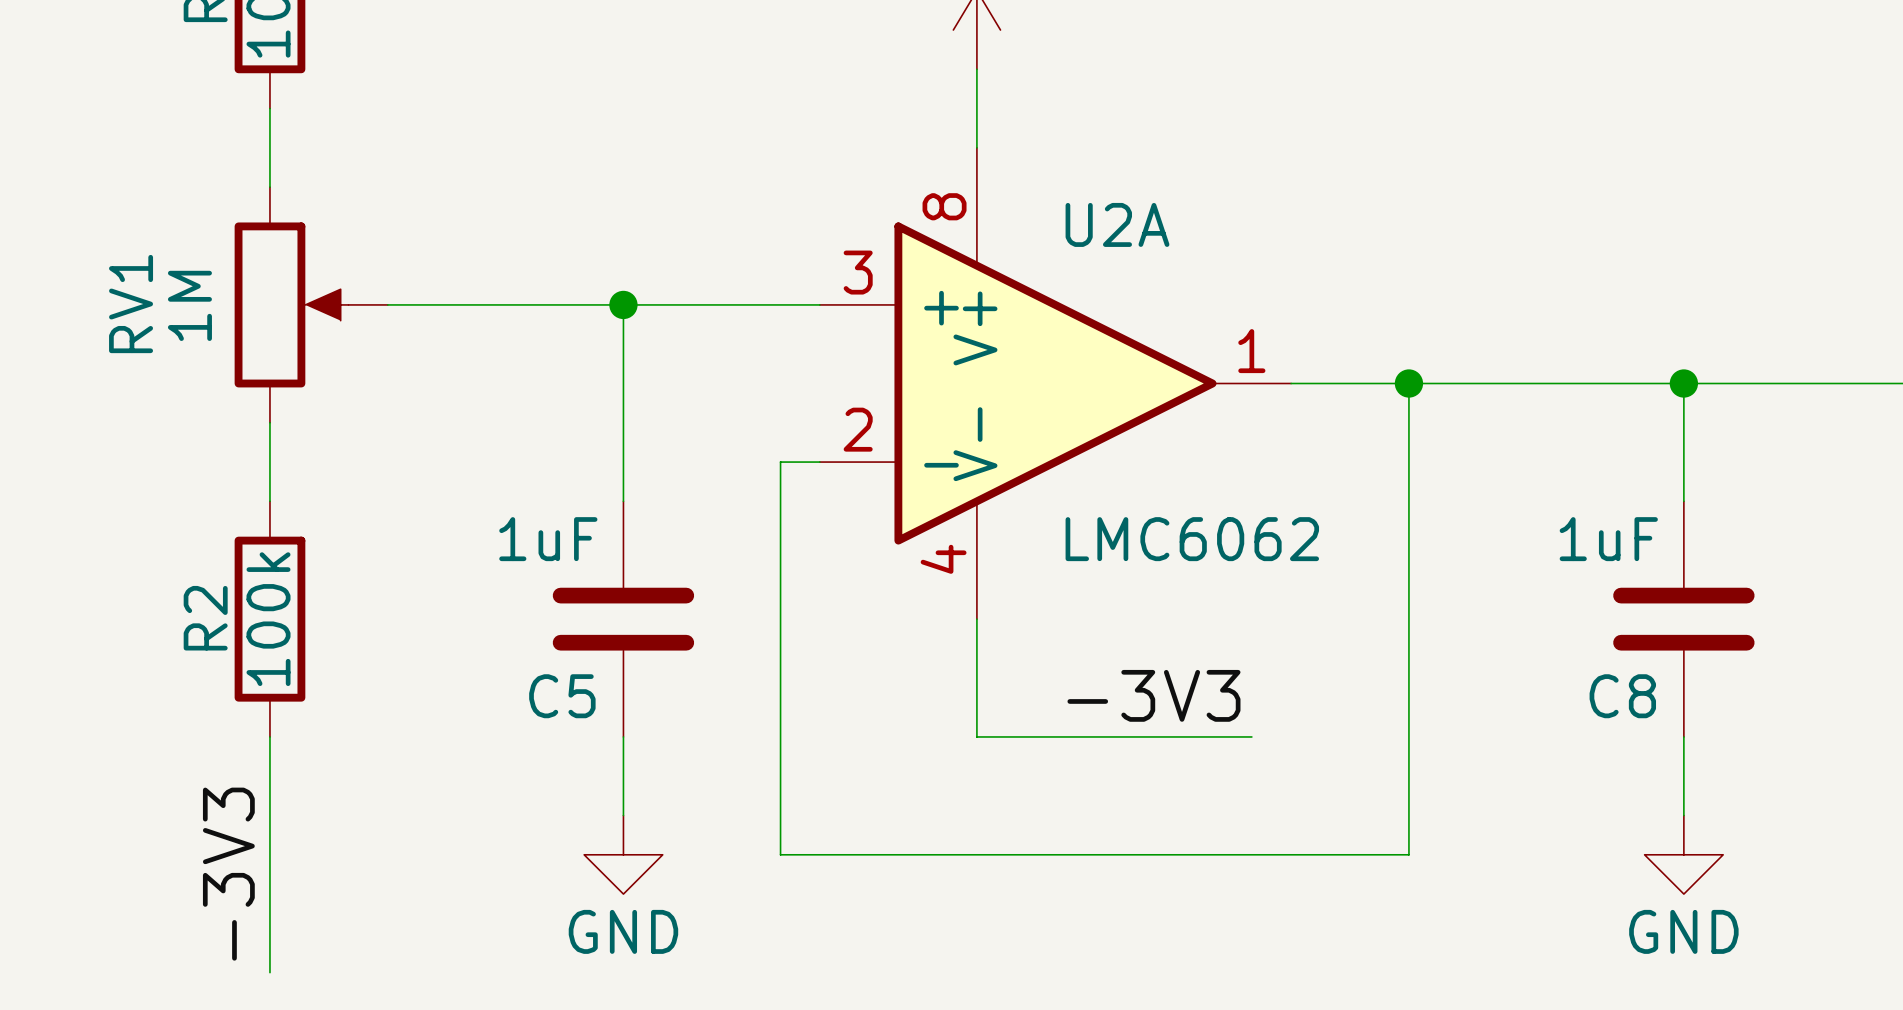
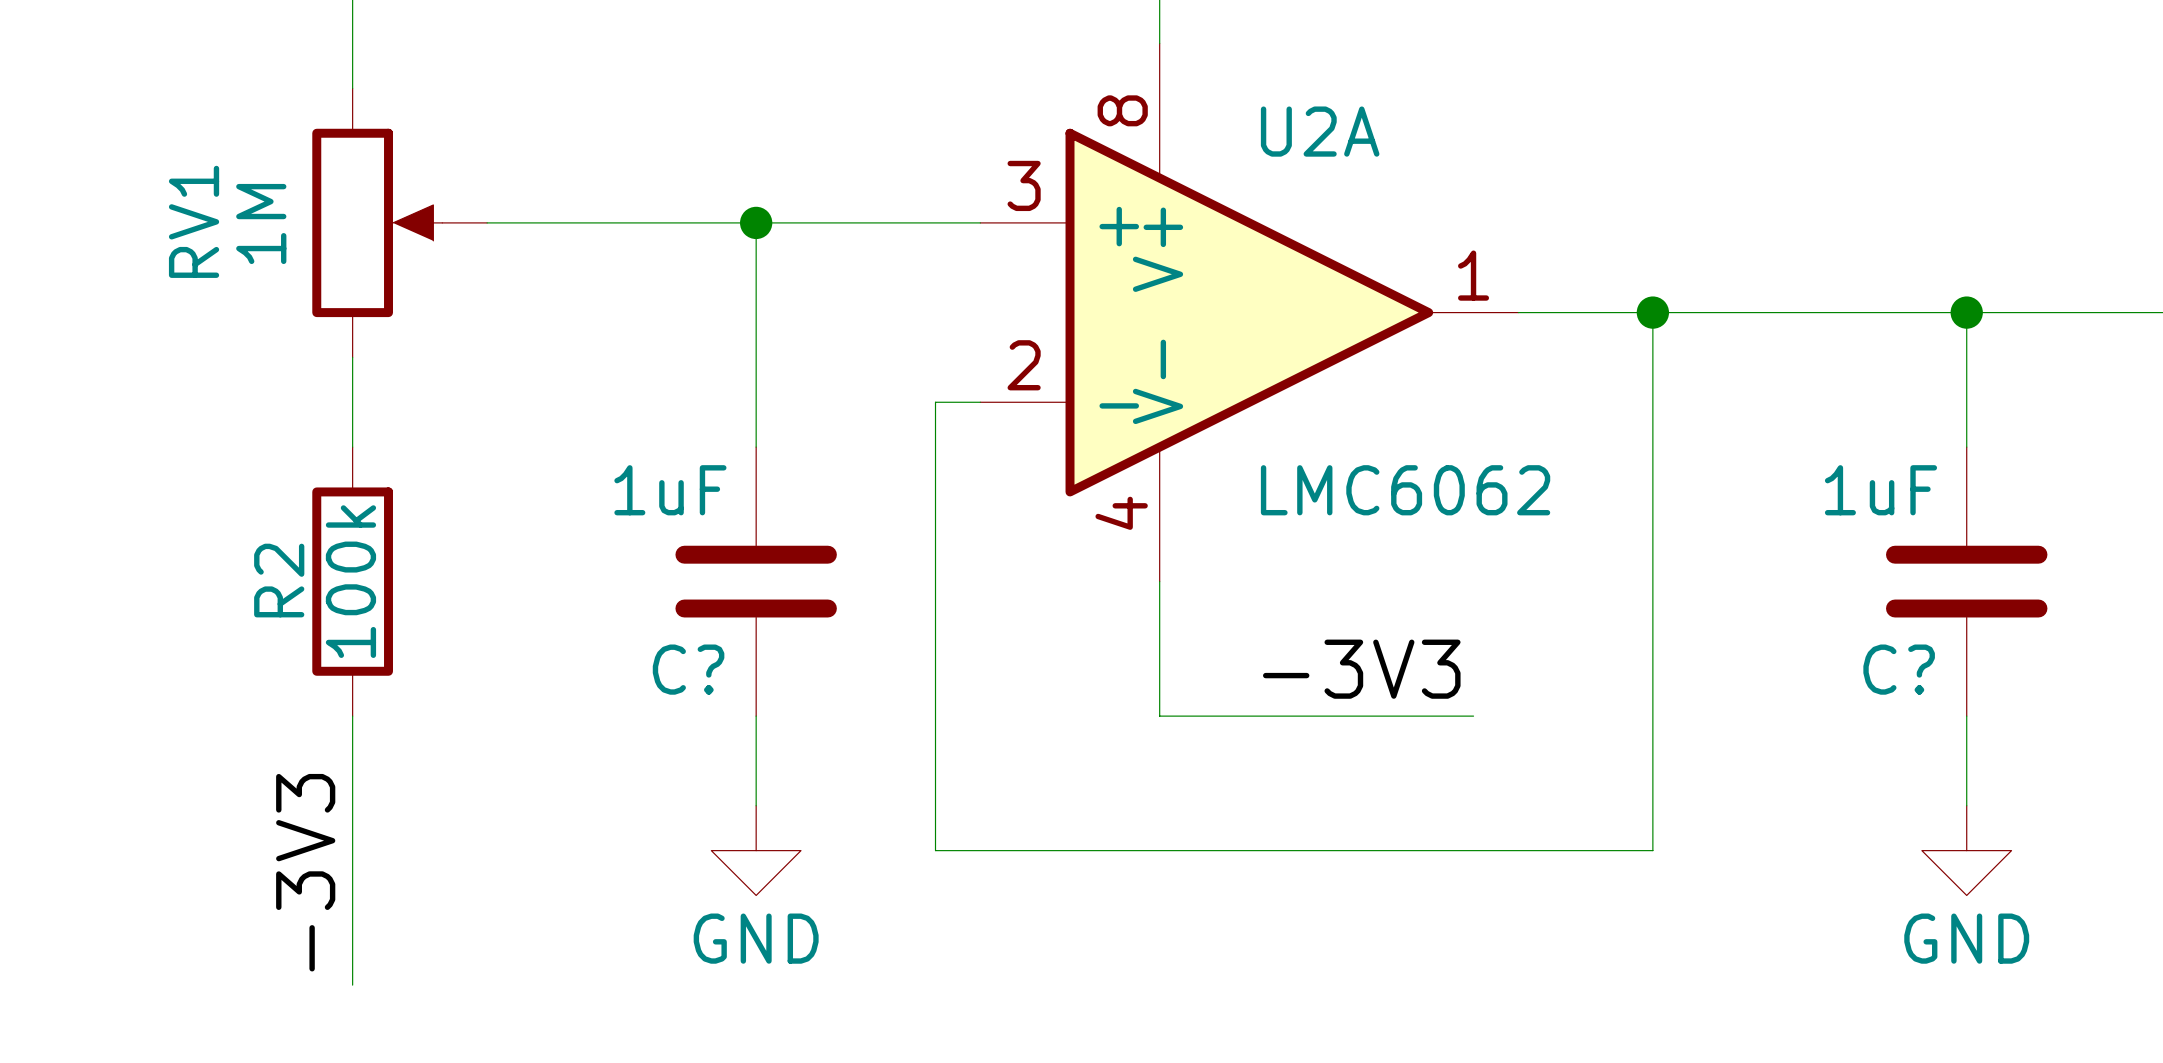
C5 name: C5 (562, 696) -> C? (688, 669)
C8 name: C8 (1622, 696) -> C? (1899, 669)

